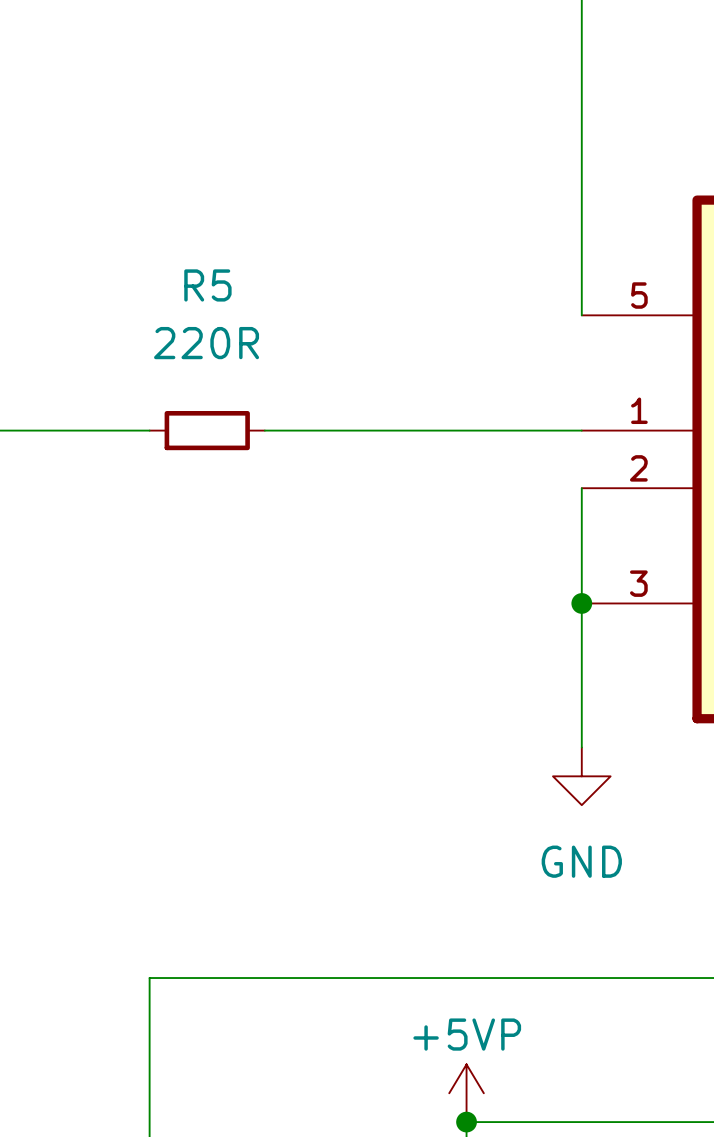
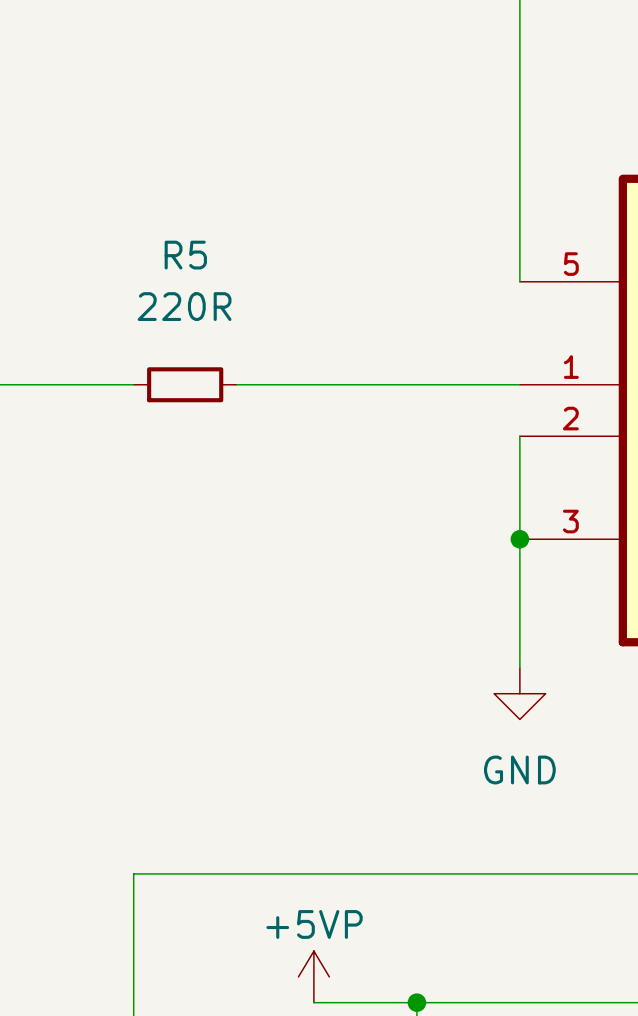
power symbol position: +5VP (466, 1093) -> +5VP (313, 976)
wire: none -> (313, 1002) (416, 1002)

